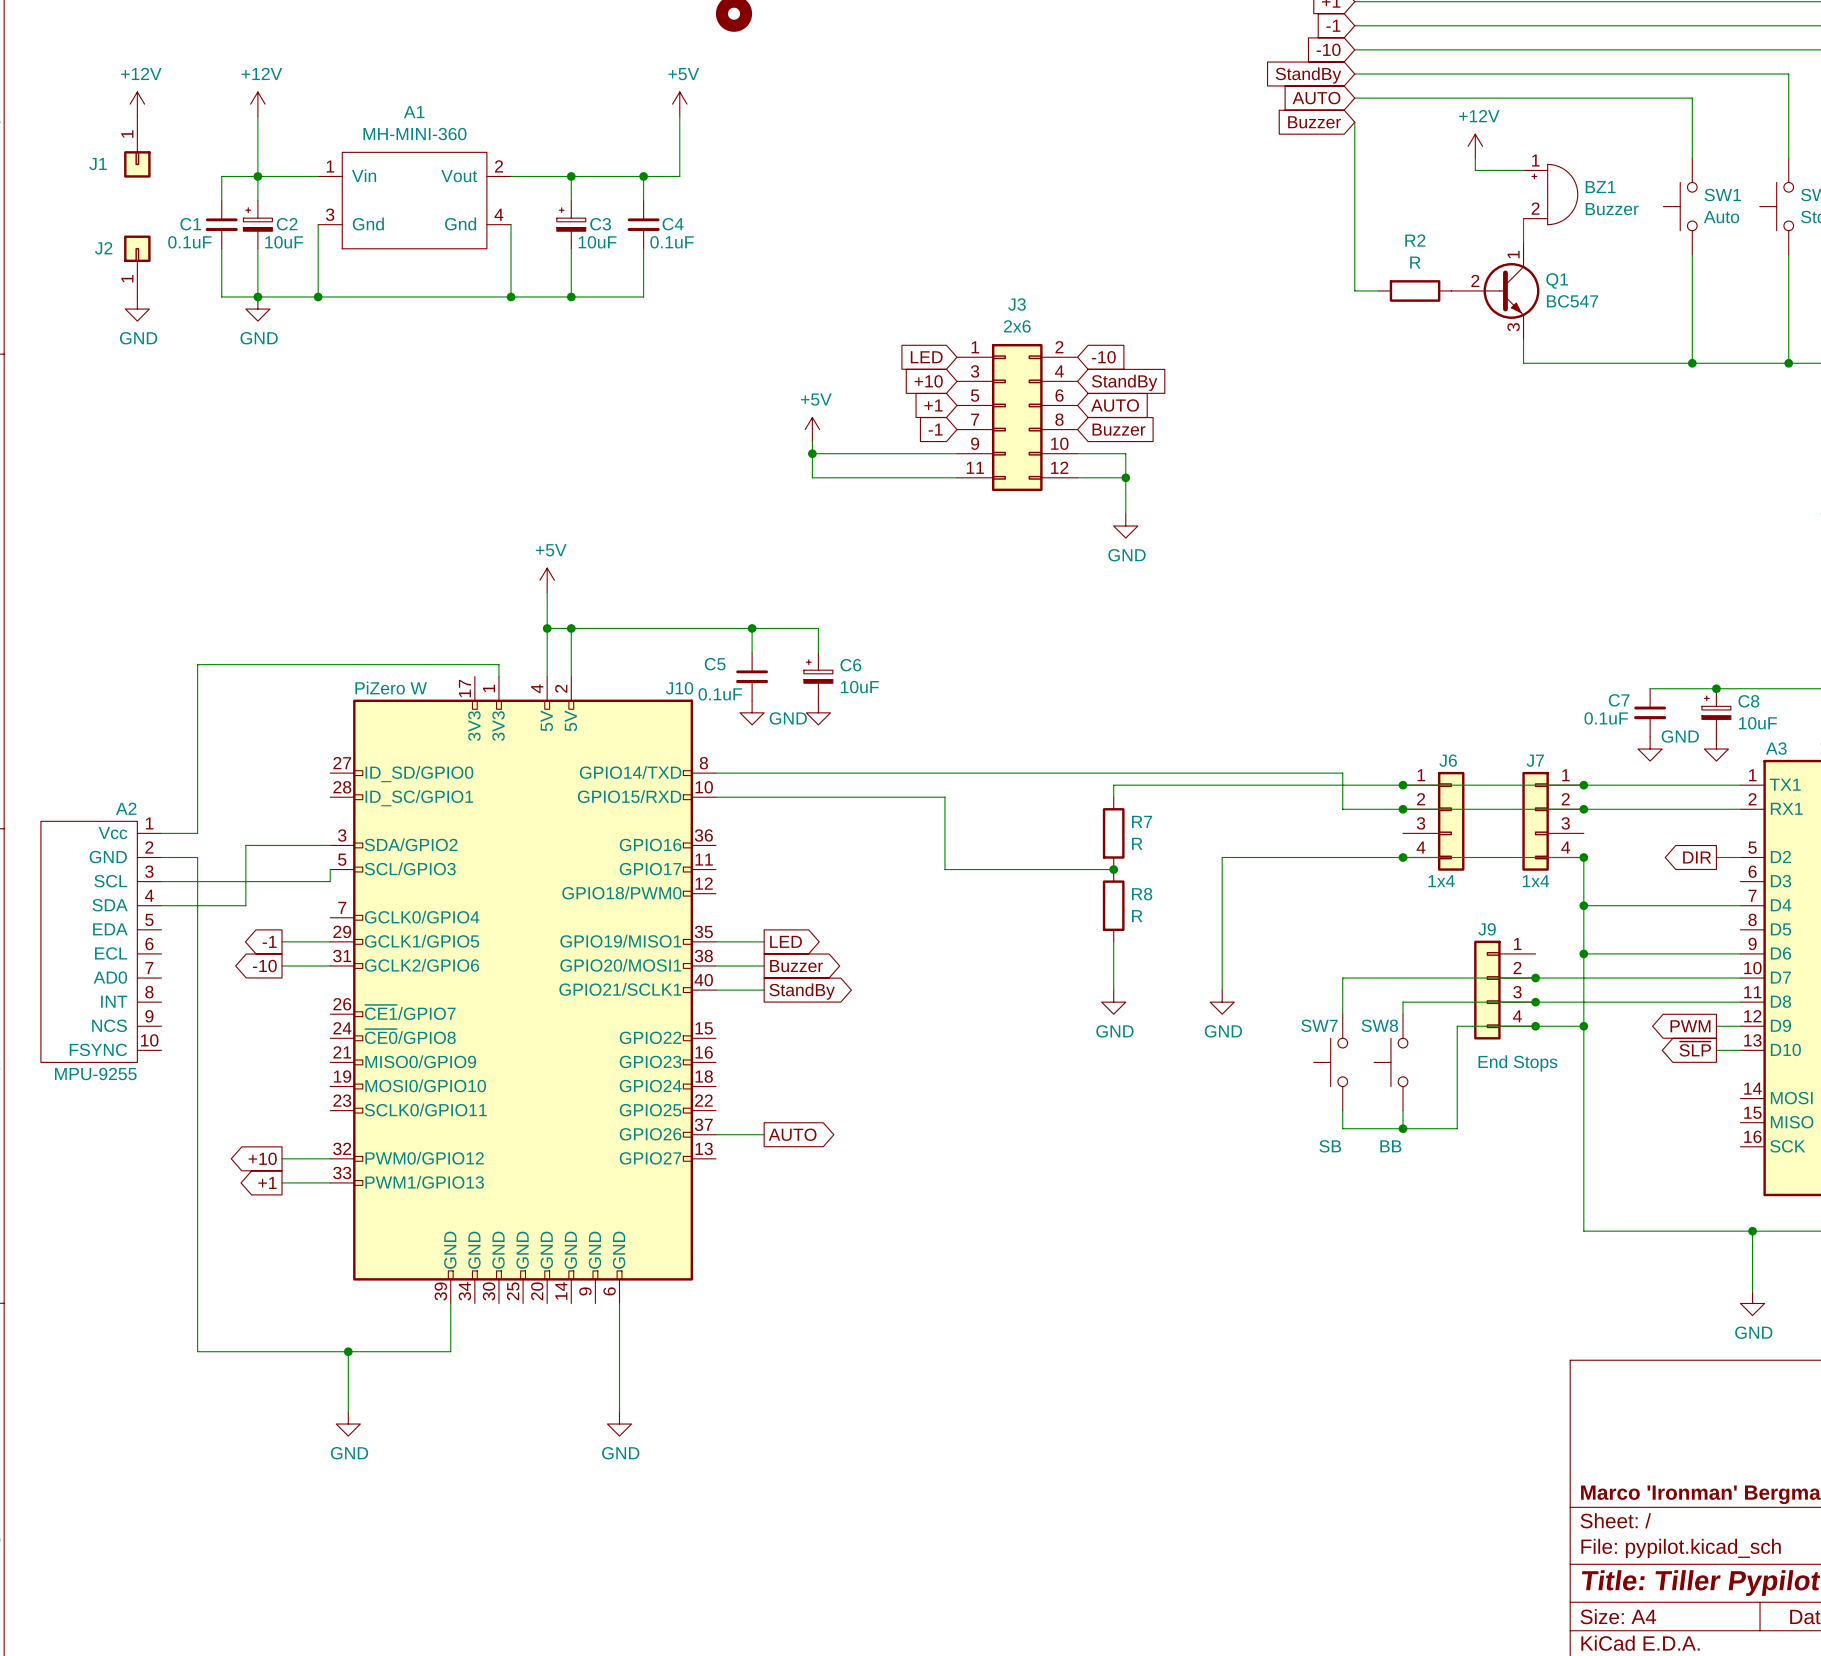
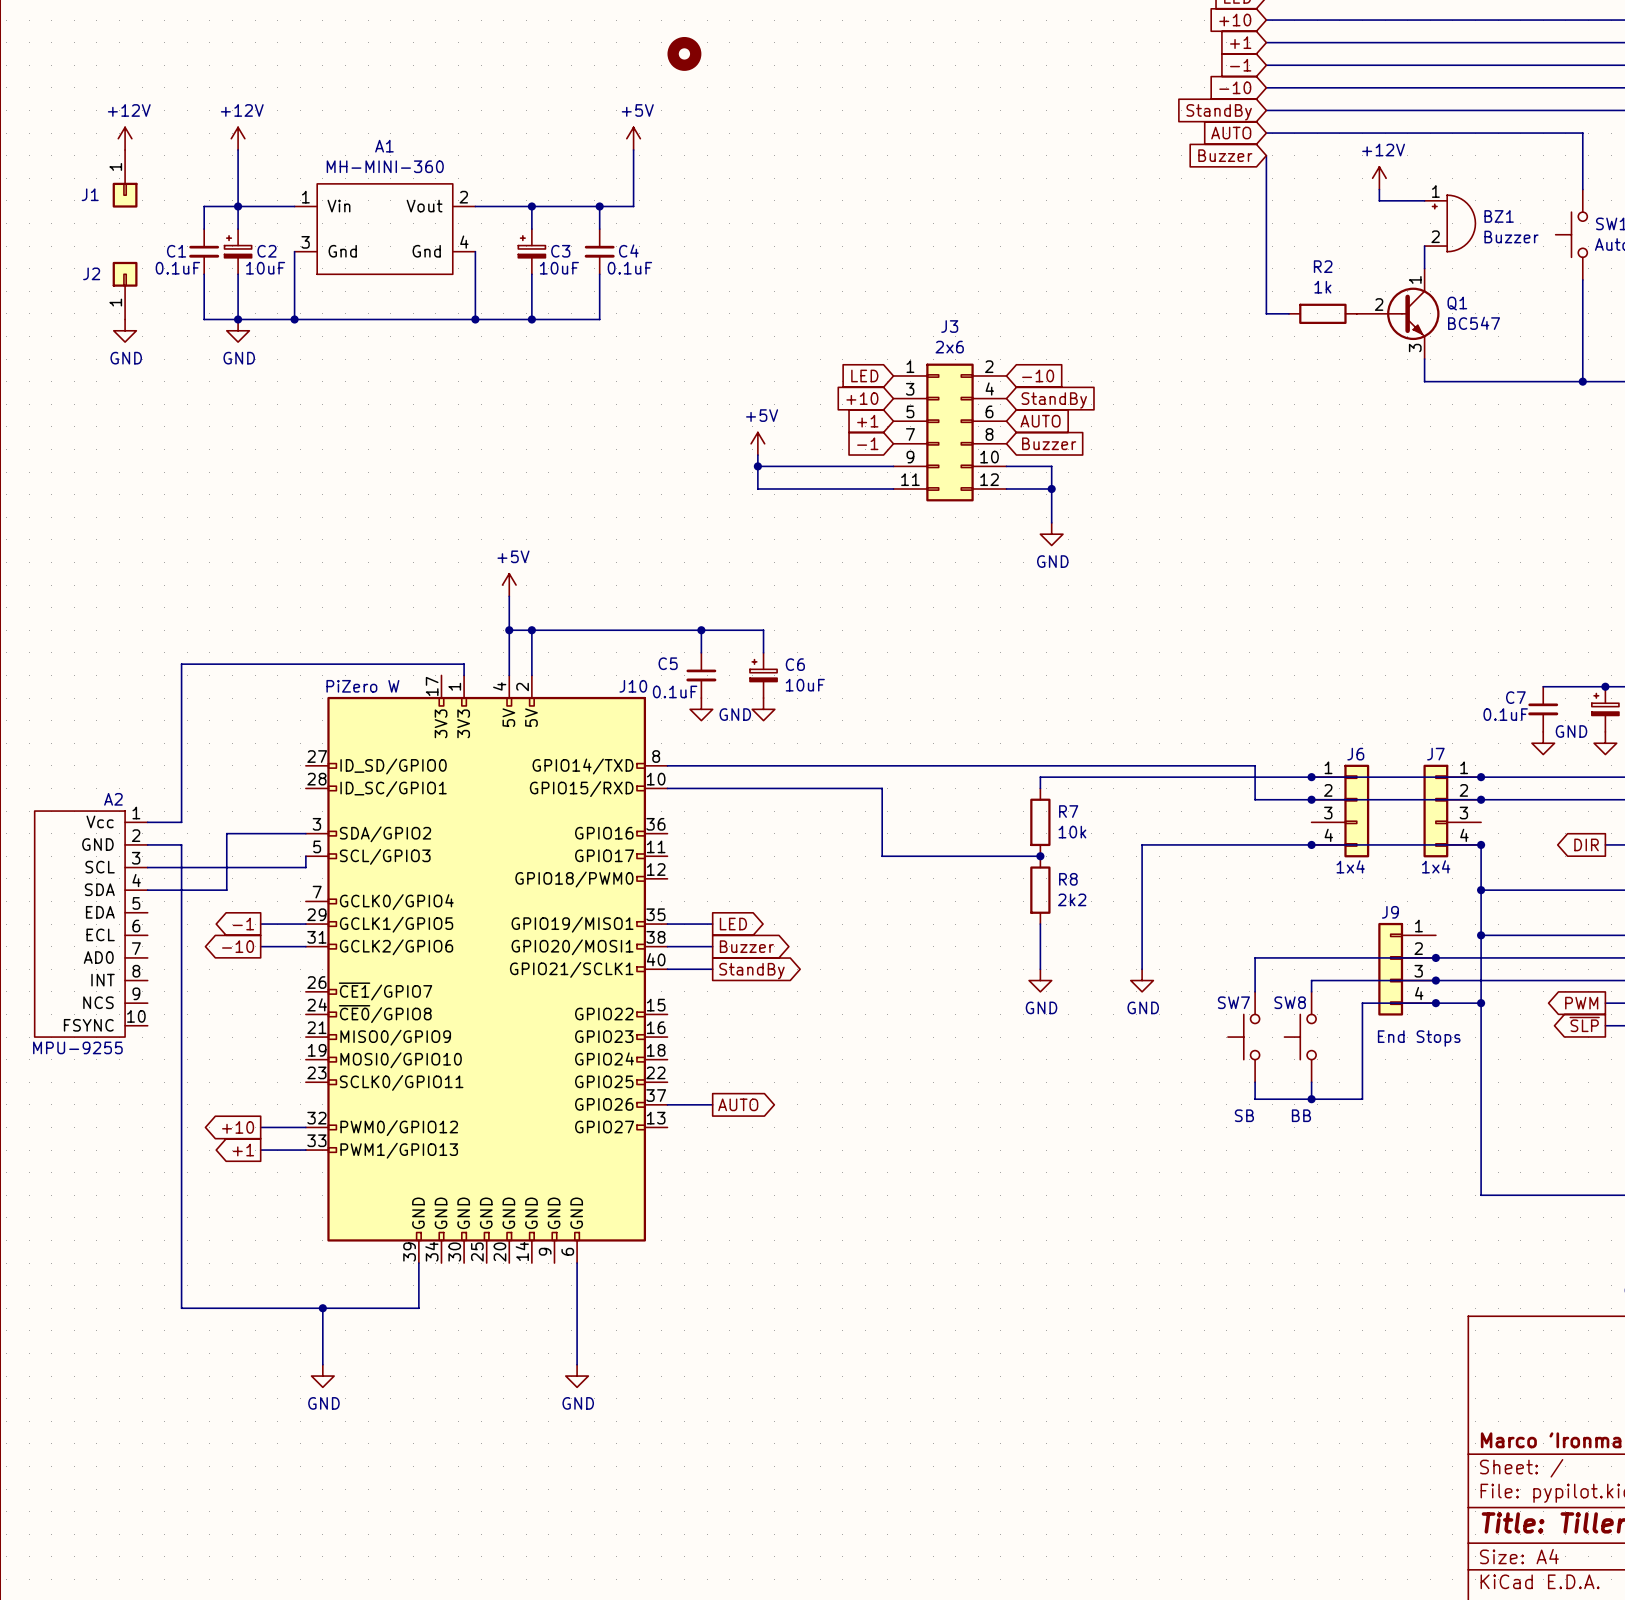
R2 value: R (1415, 262) -> 1k (1322, 287)
R7 value: R (1137, 843) -> 10k (1072, 832)
R8 value: R (1137, 916) -> 2k2 (1072, 899)

